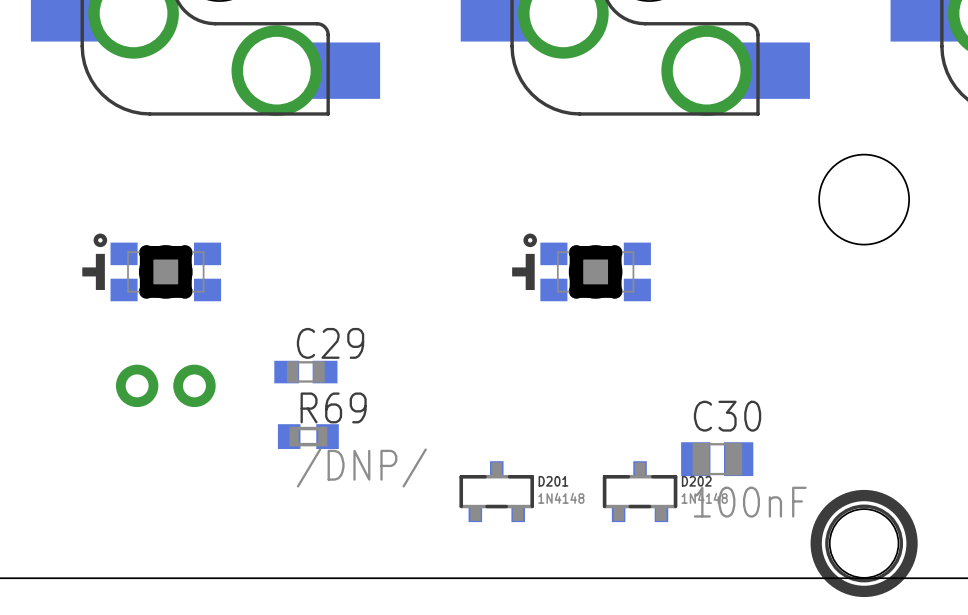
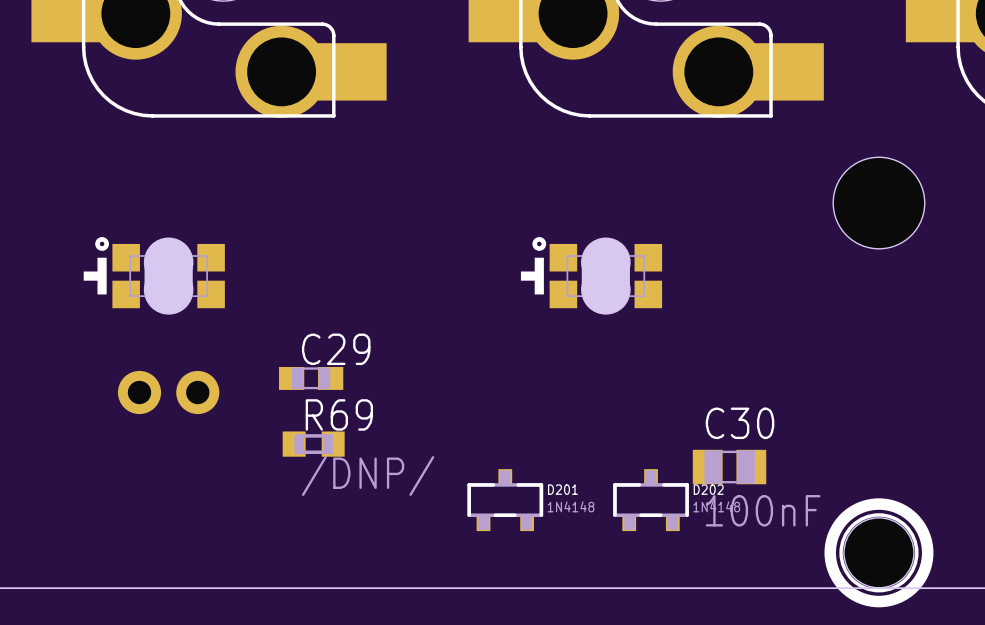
part footprint: [82, 233, 222, 302] -> [83, 237, 225, 314]
part footprint: [512, 233, 651, 302] -> [520, 237, 663, 314]

